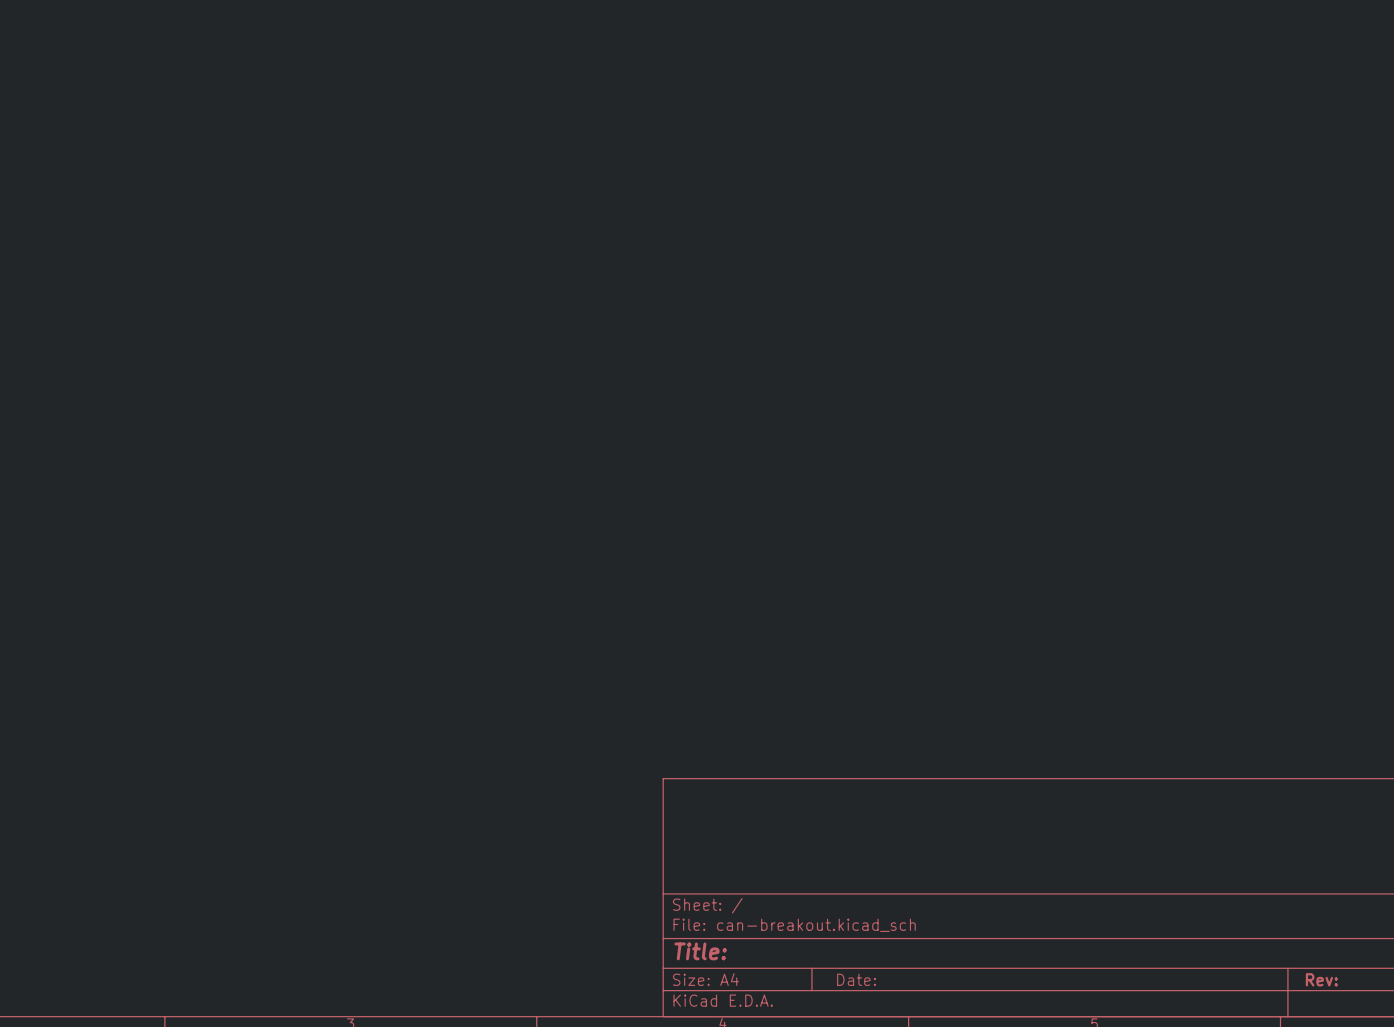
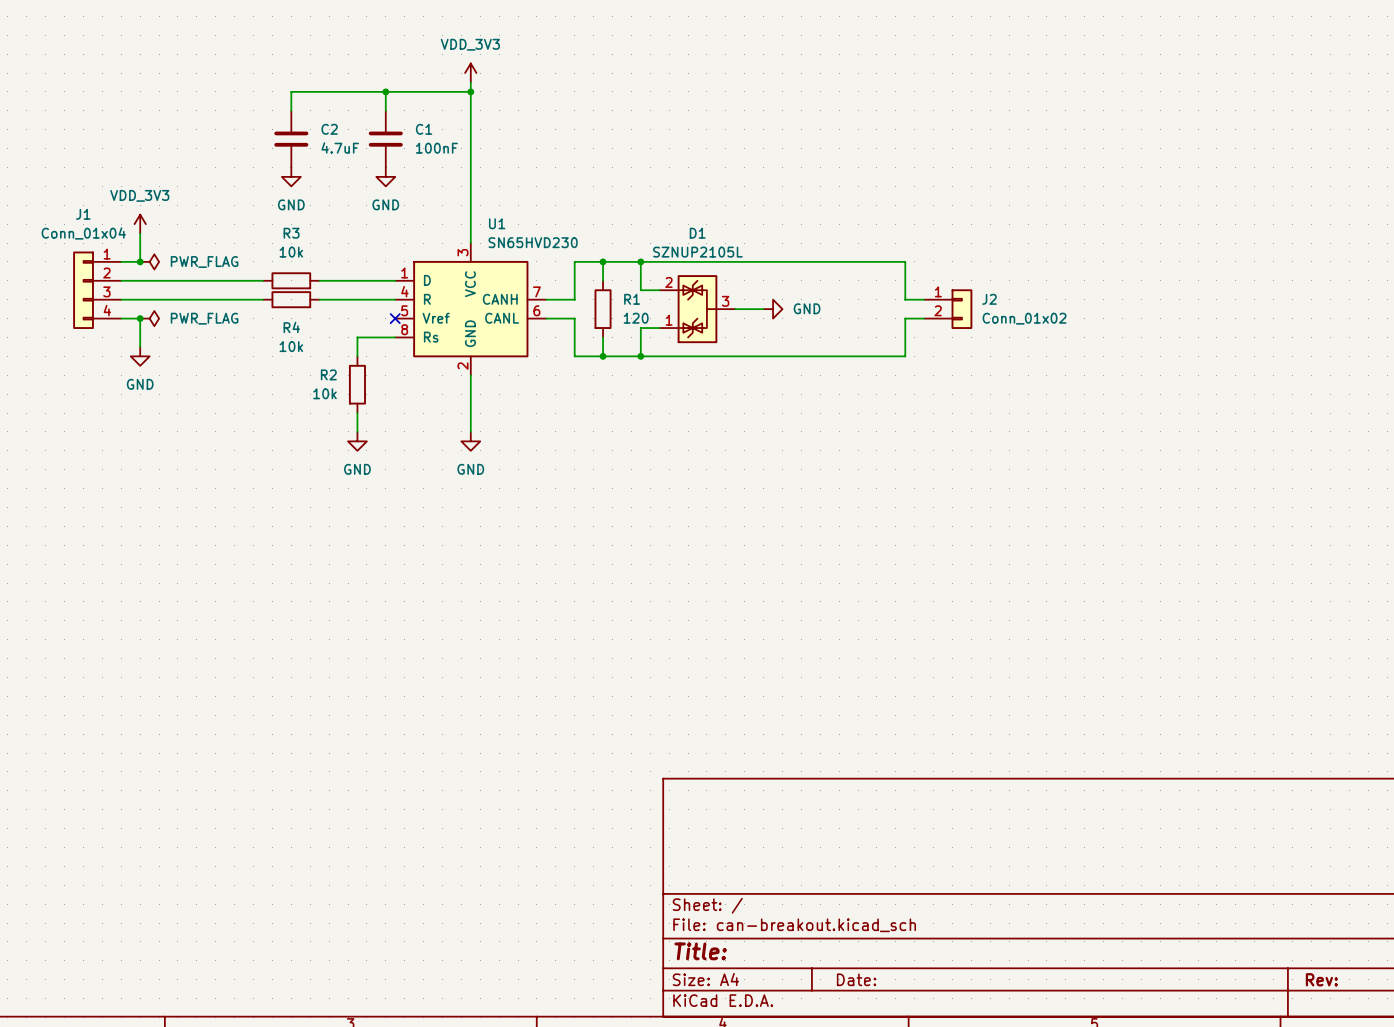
power symbol: none -> VDD_3V3 (470, 73)
wire: none -> (470, 82) (470, 243)
wire: none -> (385, 91) (385, 110)
junction: none -> (385, 91)
wire: none -> (470, 91) (291, 91) (291, 110)
junction: none -> (470, 91)
C2: none -> 4.7uF (291, 139)
C1: none -> 100nF (385, 139)
power symbol: none -> GND (291, 176)
power symbol: none -> GND (385, 176)
power symbol: none -> VDD_3V3 (140, 224)
wire: none -> (140, 233) (140, 261) (121, 261)
junction: none -> (140, 261)
power symbol: none -> PWR_FLAG (149, 261)
wire: none -> (603, 261) (603, 280)
junction: none -> (603, 261)
wire: none -> (640, 261) (640, 290) (659, 290)
junction: none -> (640, 261)
wire: none -> (121, 280) (262, 280)
R3: none -> 10k (291, 280)
wire: none -> (319, 280) (395, 280)
J1: none -> Conn_01x04 (97, 290)
wire: none -> (121, 299) (262, 299)
R4: none -> 10k (291, 299)
wire: none -> (319, 299) (395, 299)
wire: none -> (546, 299) (574, 299) (574, 261) (905, 261) (905, 299) (924, 299)
U1: none -> SN65HVD230 (470, 309)
R1: none -> 120 (603, 309)
D1: none -> SZNUP2105L (697, 309)
wire: none -> (735, 309) (763, 309)
power symbol: none -> GND (773, 309)
J2: none -> Conn_01x02 (948, 309)
wire: none -> (121, 318) (140, 318) (140, 346)
junction: none -> (140, 318)
power symbol: none -> PWR_FLAG (149, 318)
no-connect mark: none -> (395, 318)
wire: none -> (546, 318) (574, 318) (574, 356) (905, 356) (905, 318) (924, 318)
wire: none -> (659, 328) (640, 328) (640, 356)
wire: none -> (395, 337) (357, 337) (357, 356)
wire: none -> (603, 337) (603, 356)
power symbol: none -> GND (140, 356)
junction: none -> (603, 356)
junction: none -> (640, 356)
wire: none -> (470, 375) (470, 431)
R2: none -> 10k (357, 384)
wire: none -> (357, 413) (357, 431)
power symbol: none -> GND (357, 441)
power symbol: none -> GND (470, 441)

